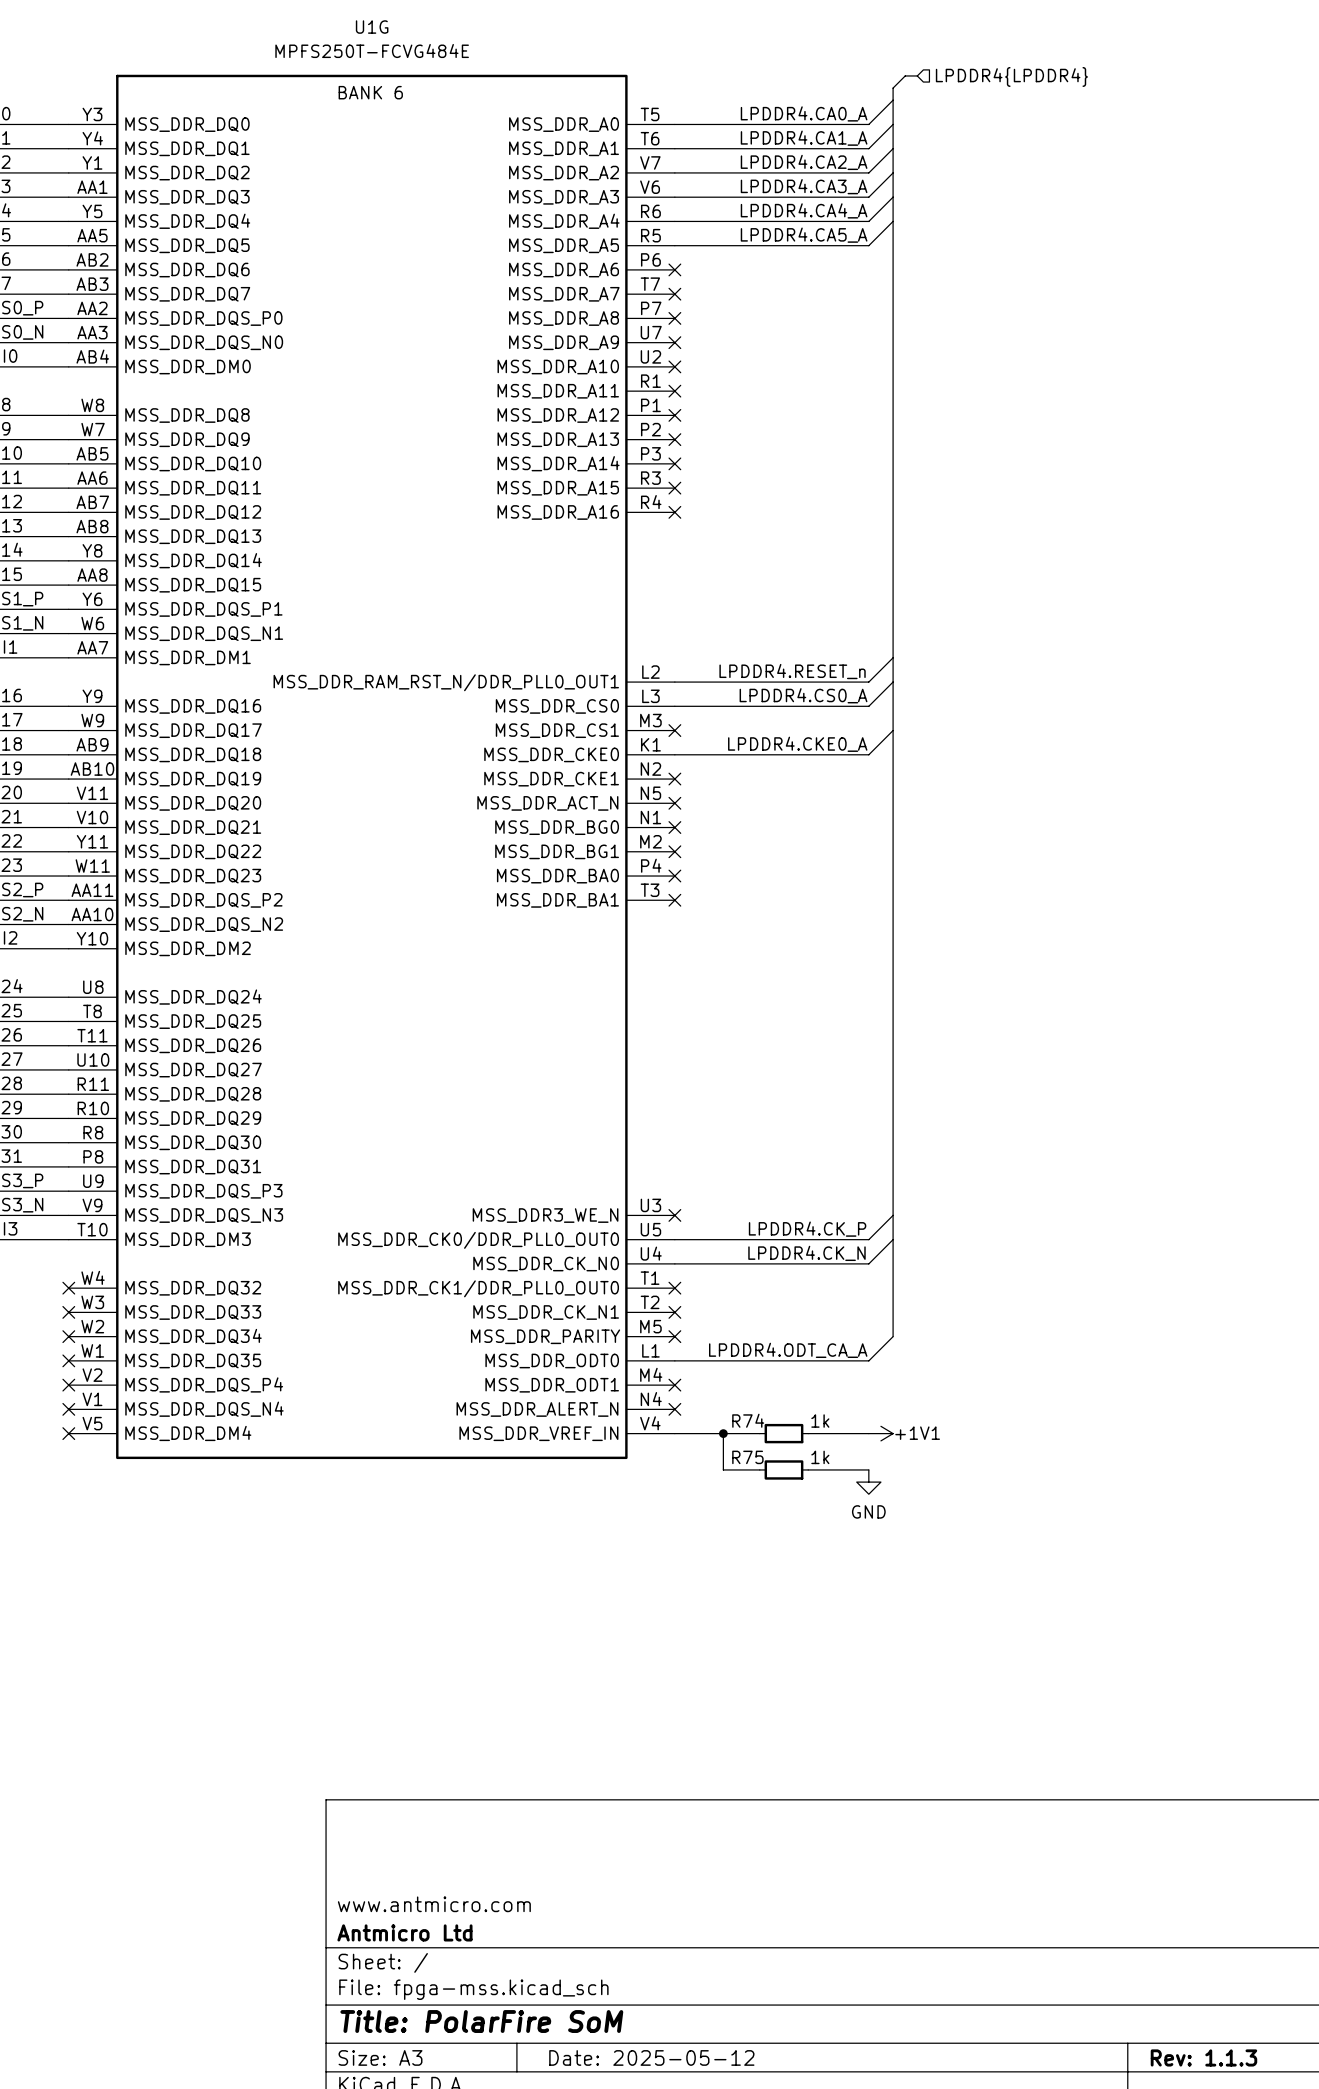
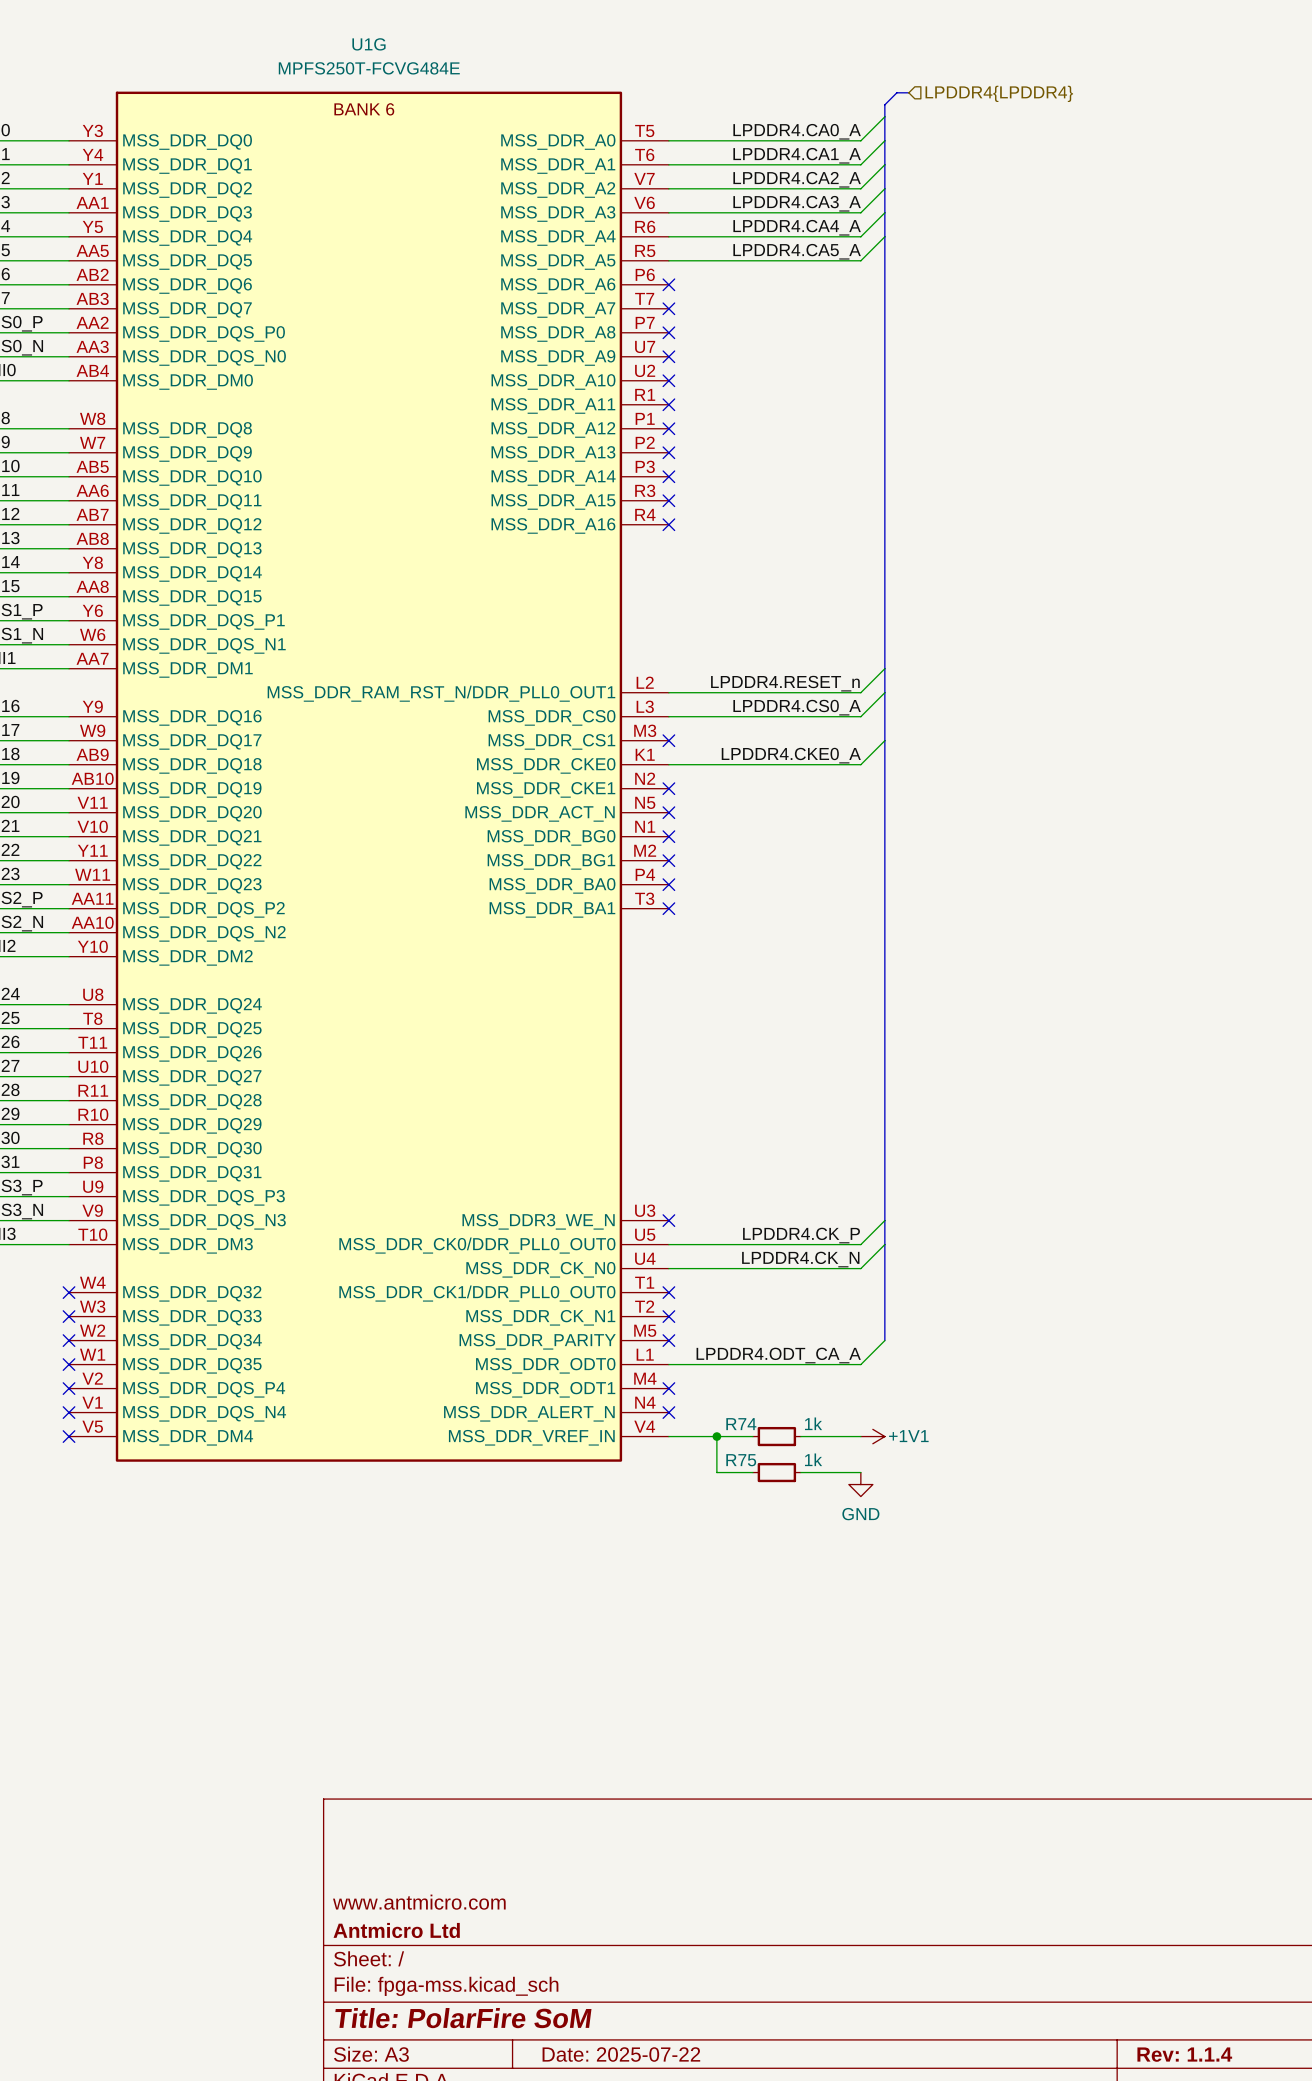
title block: Date: 2025-05-12 (651, 2057) -> Date: 2025-07-22 (621, 2054)
title block: Rev: 1.1.3 (1203, 2057) -> Rev: 1.1.4 (1184, 2054)

